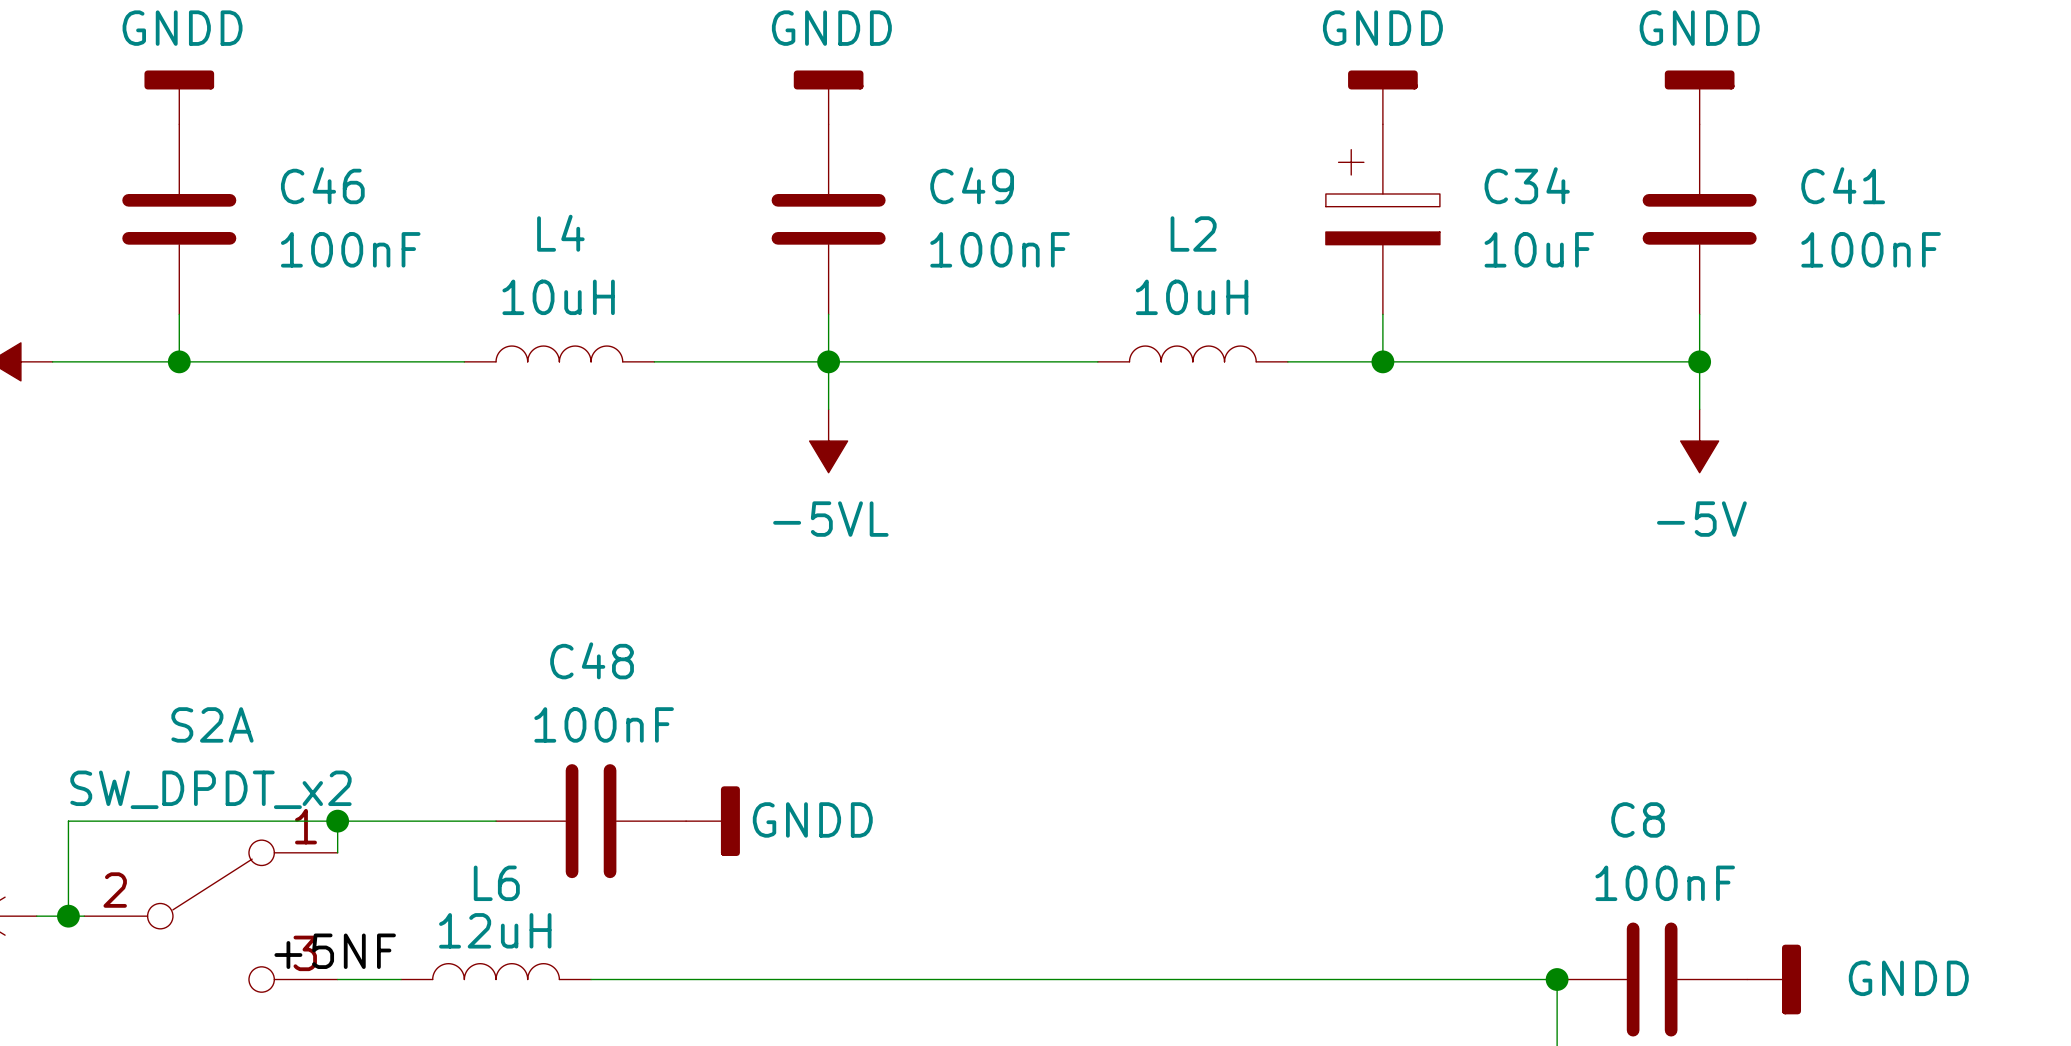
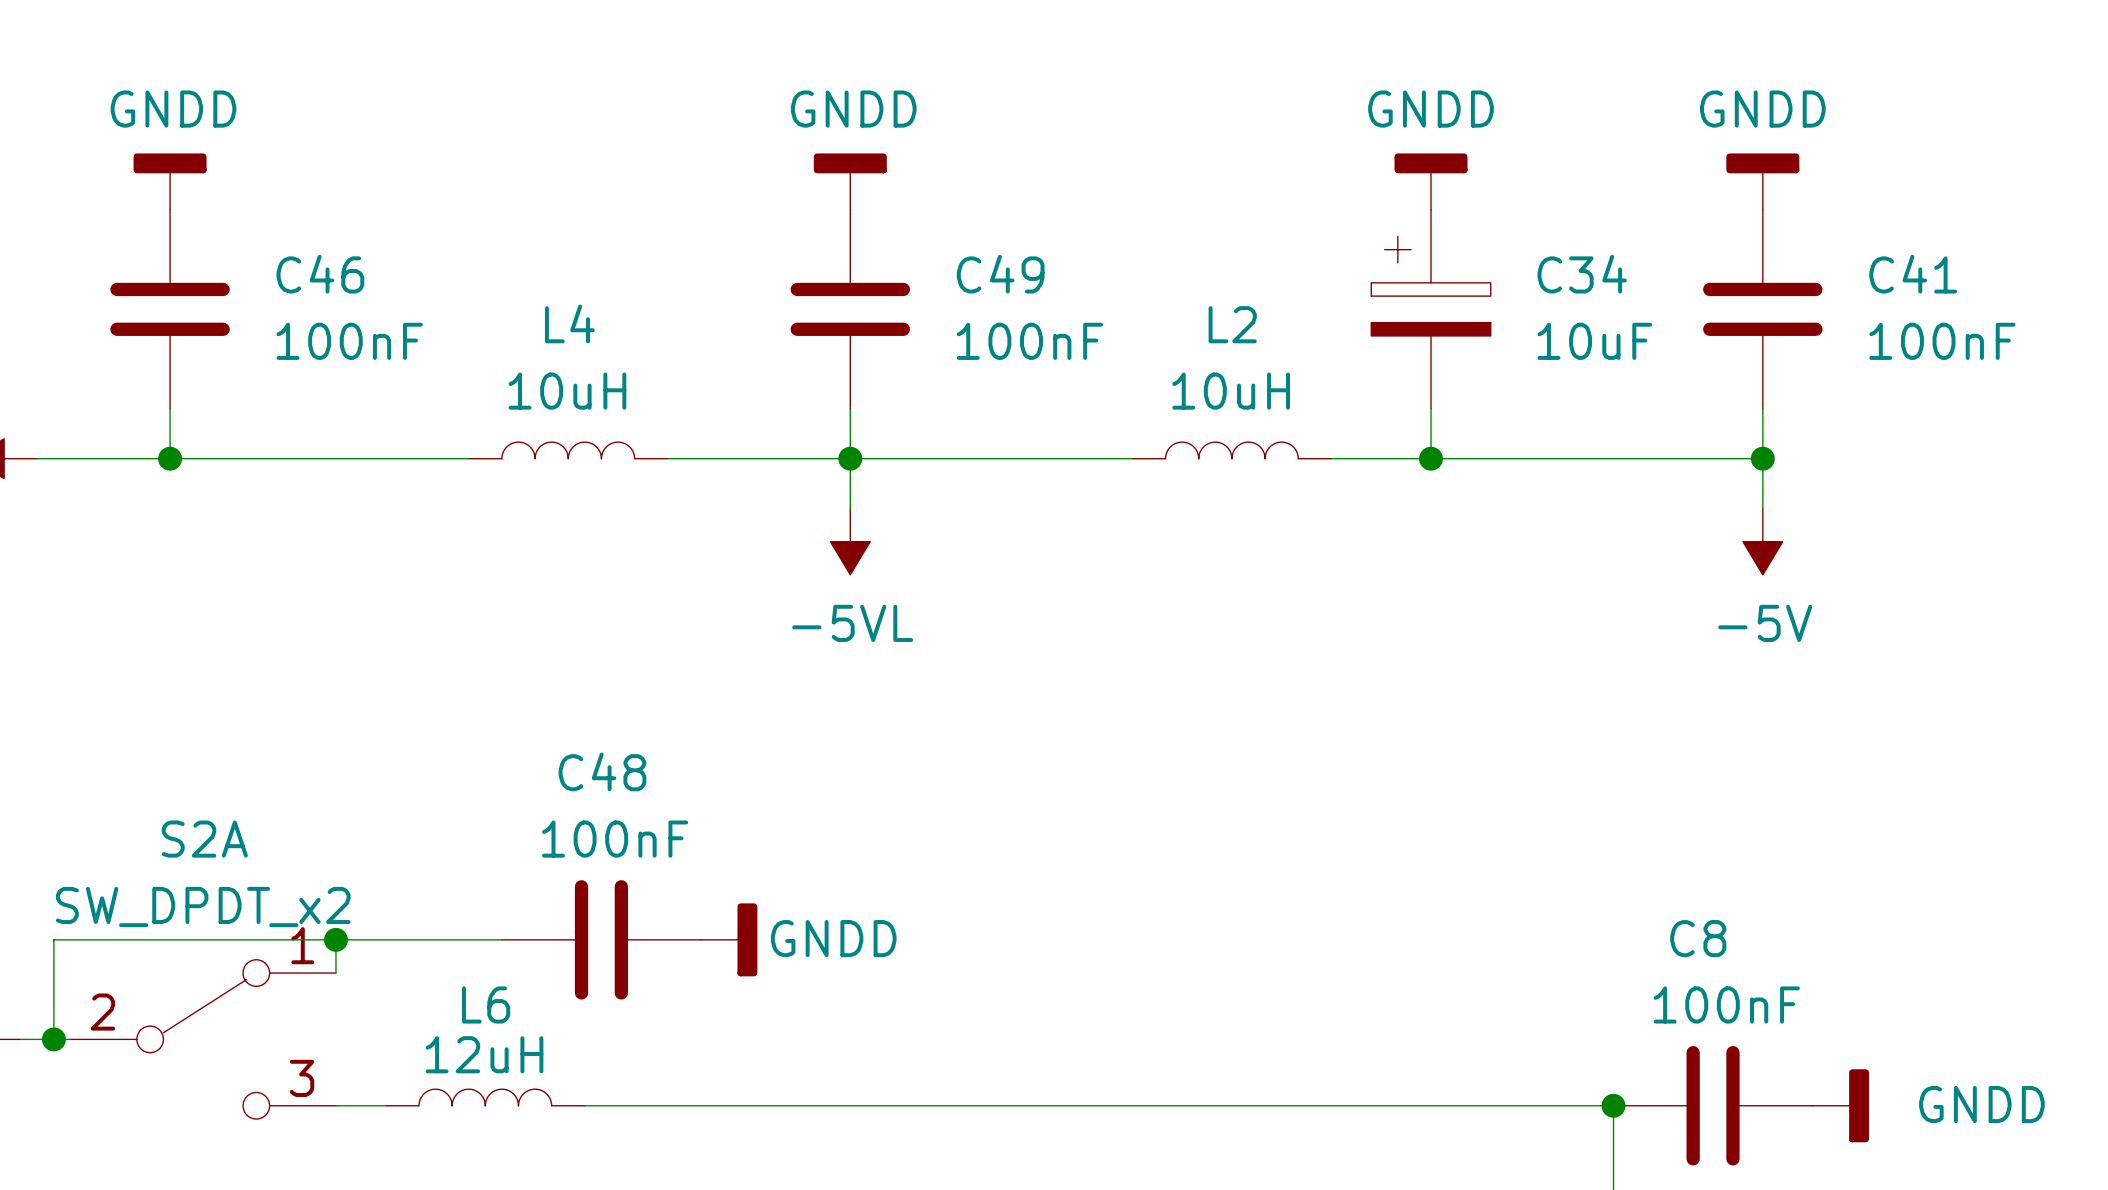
label: +5NF (335, 951) -> none
L6 position: (496, 971) -> (485, 1097)

